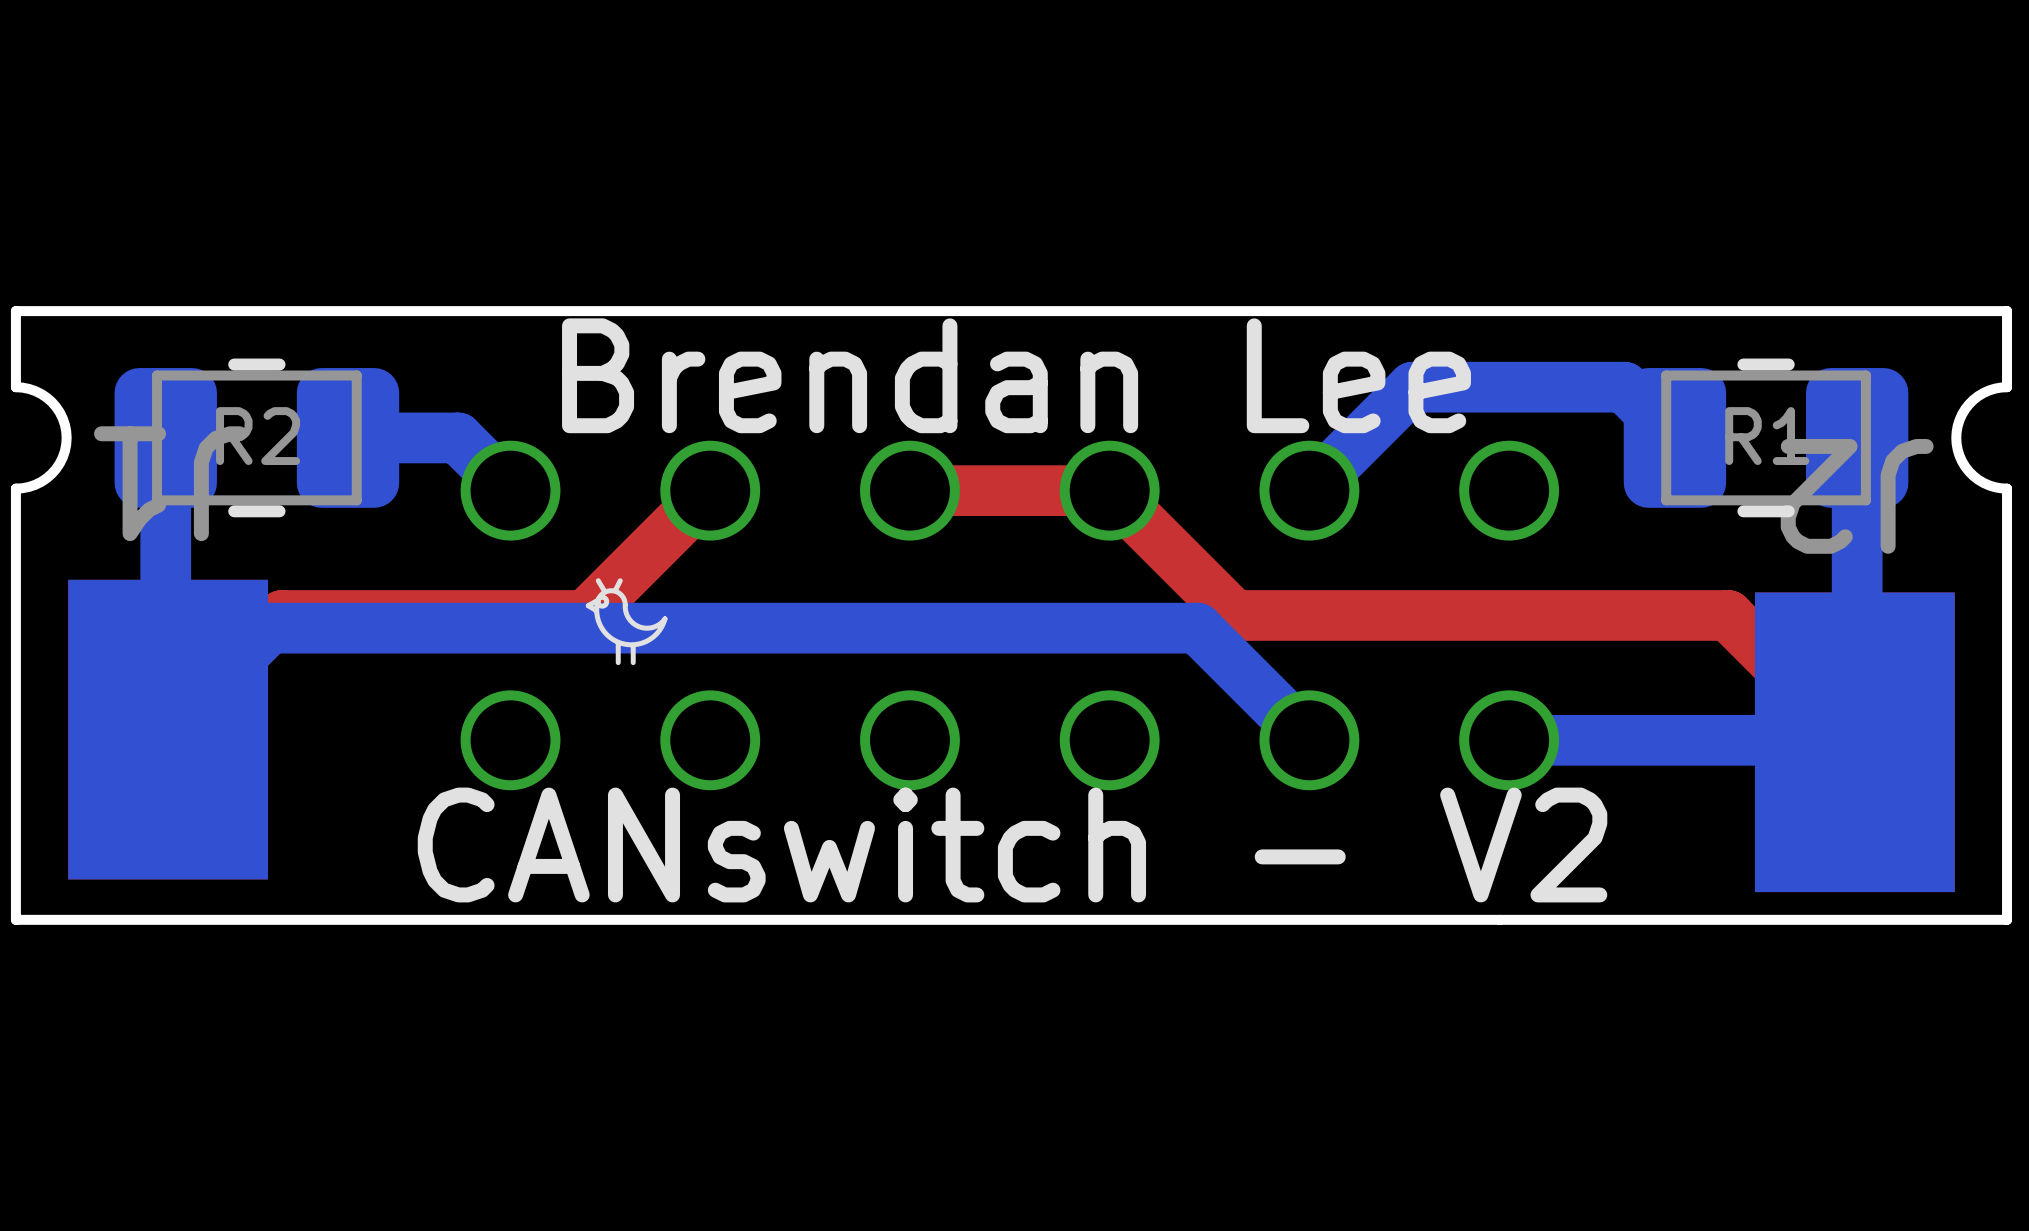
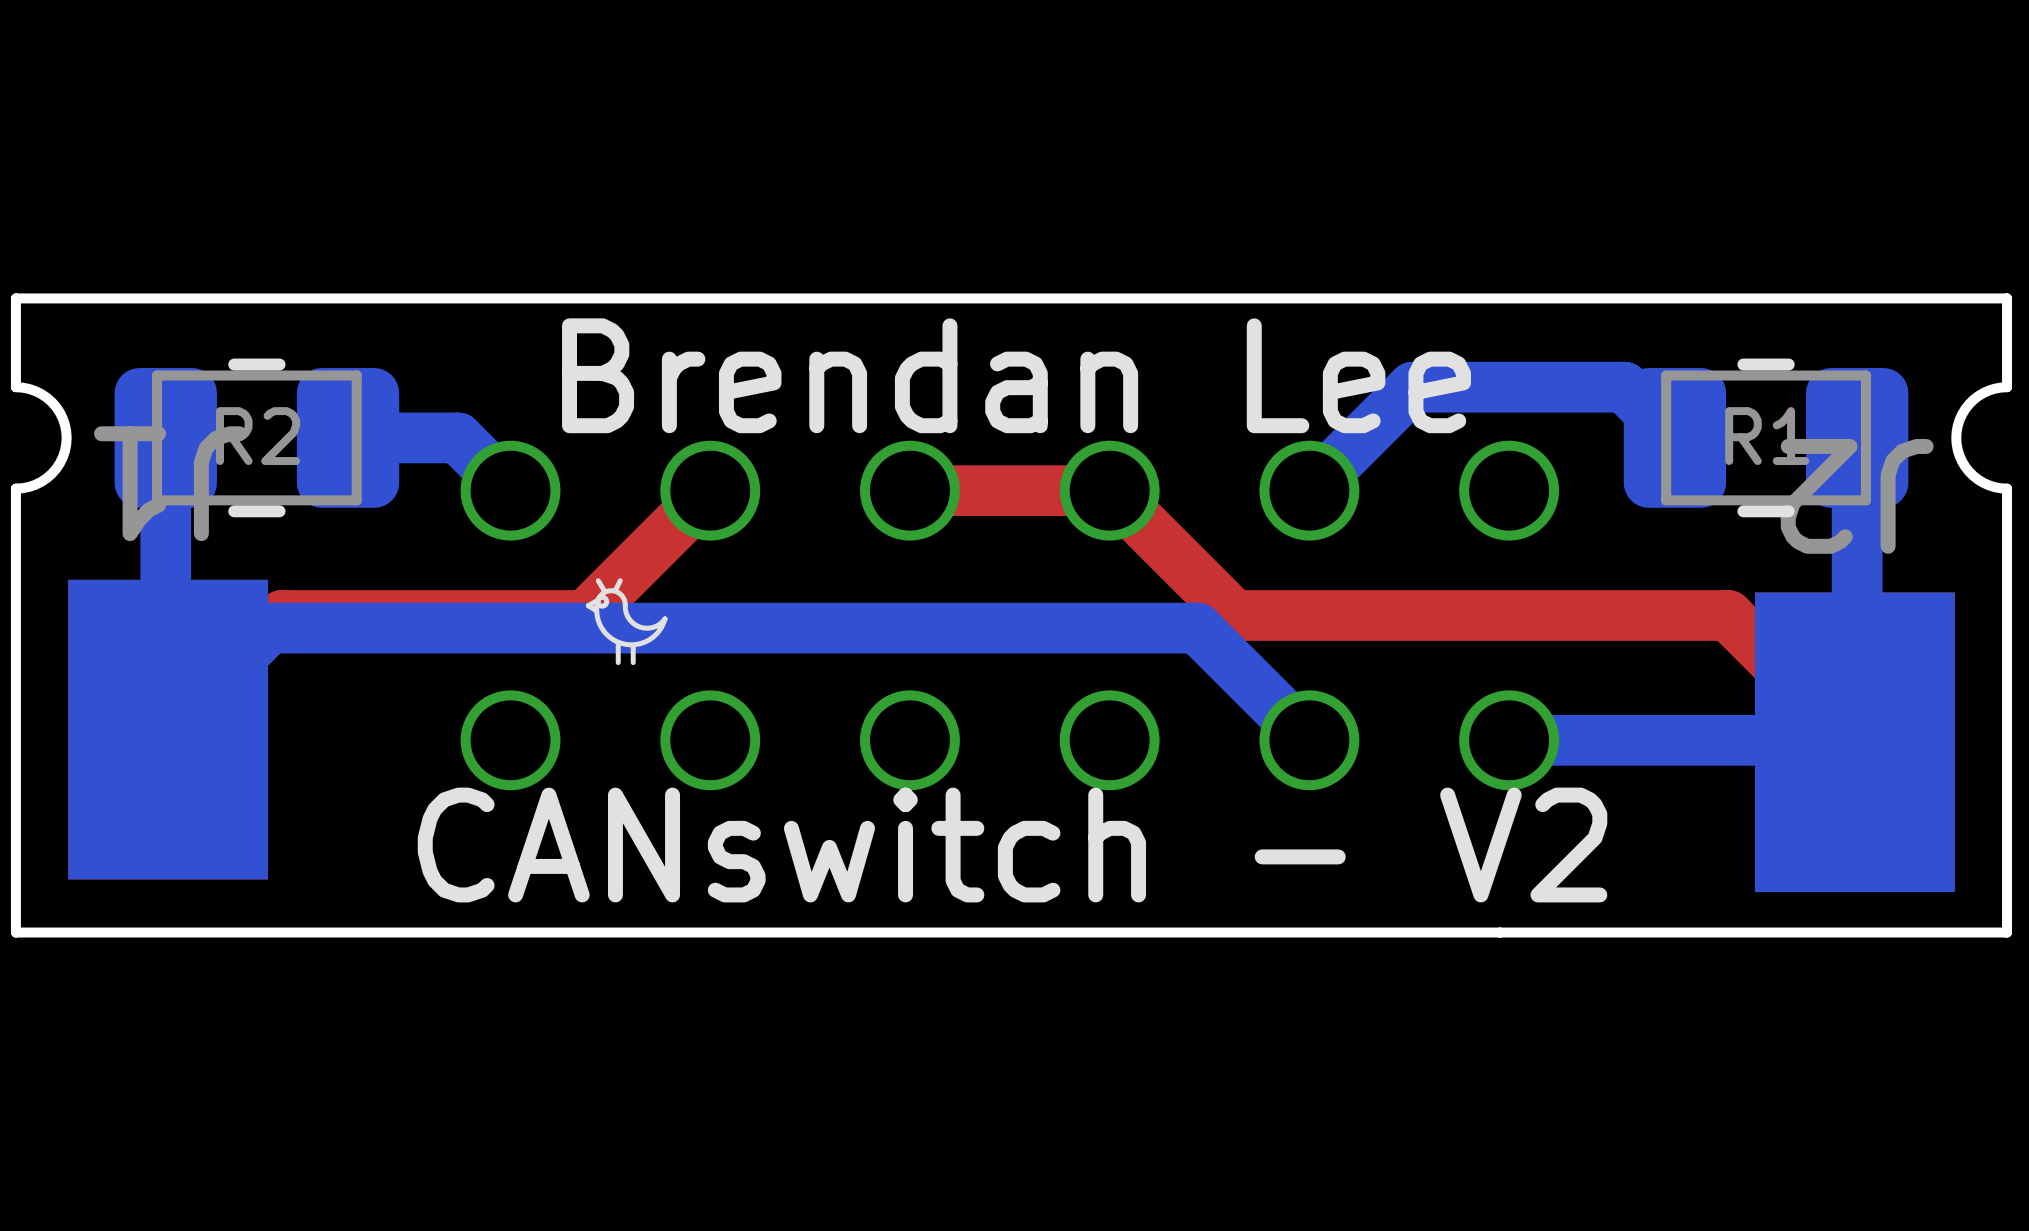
board edge: (2007, 311) (15, 311) -> (2007, 311) (2007, 298) (15, 298) (15, 311)
board edge: (2007, 919) (15, 919) -> (2007, 919) (2007, 932) (15, 932) (15, 919)

